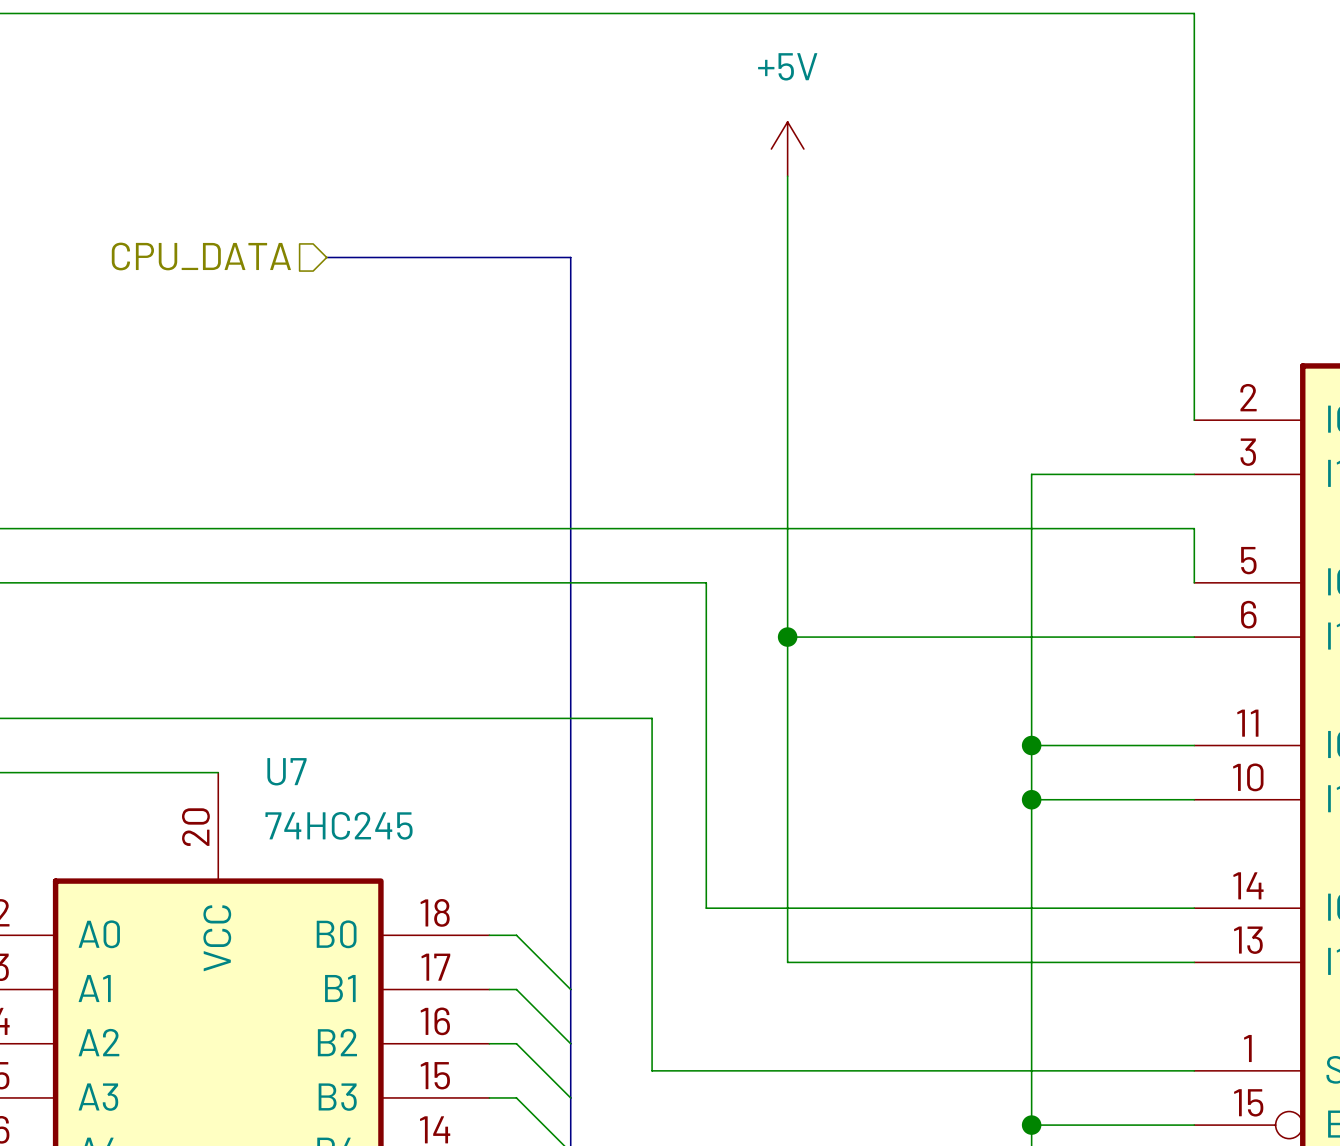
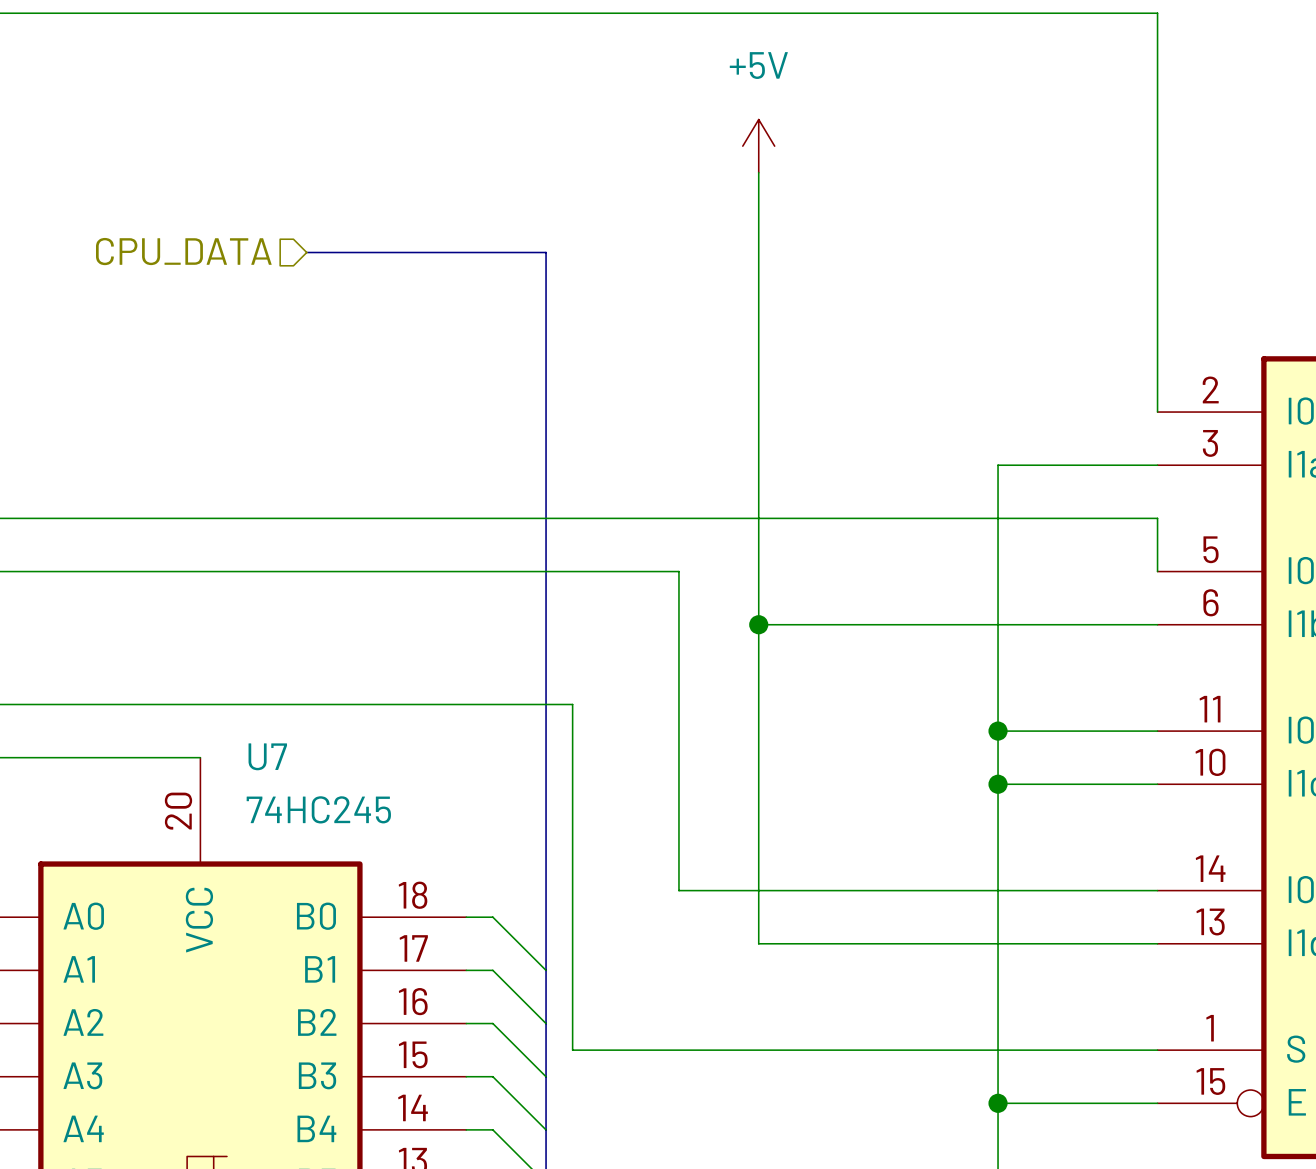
wire: (597, 718) (652, 718) (652, 1070) -> (572, 704) (572, 1050) (625, 1050)

